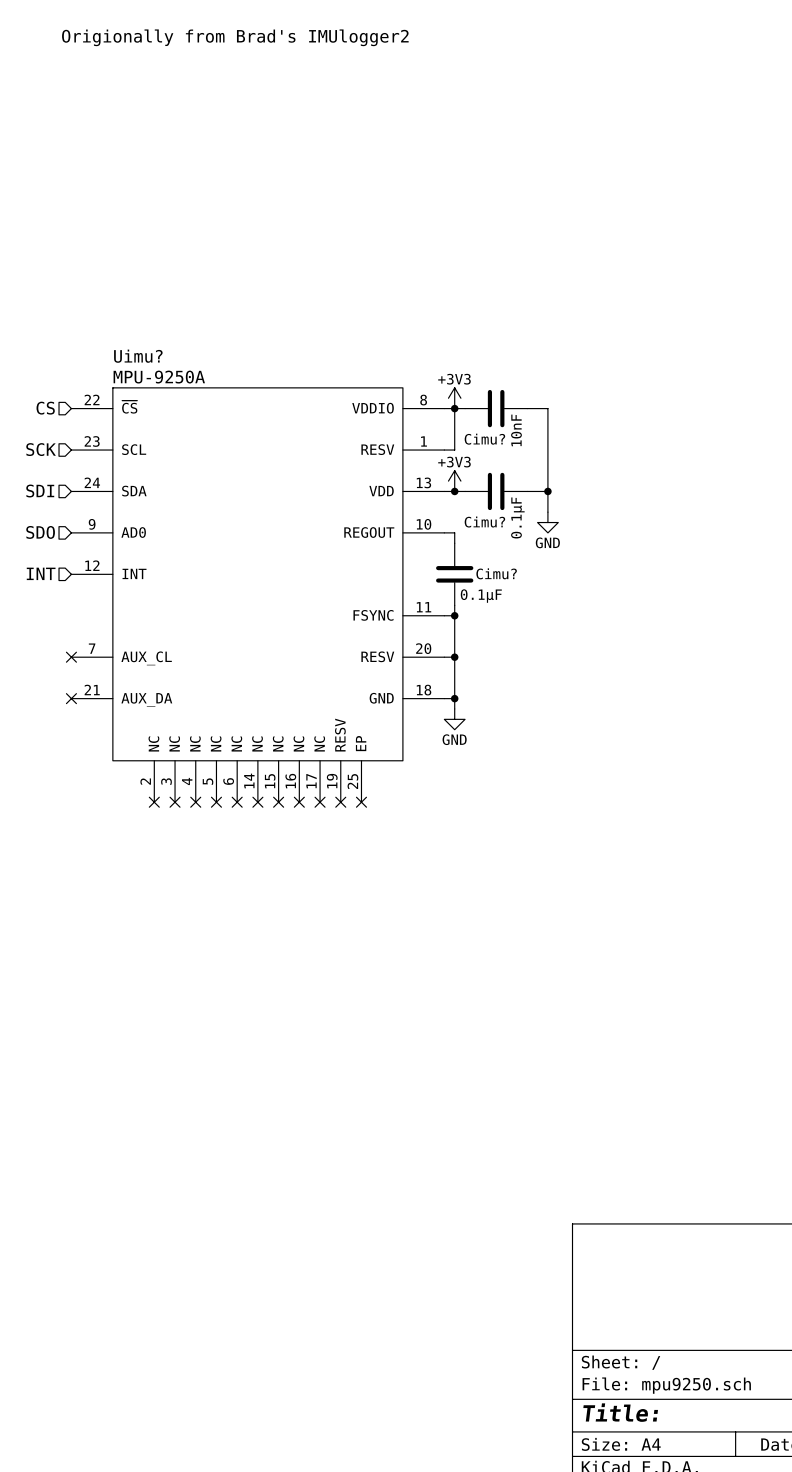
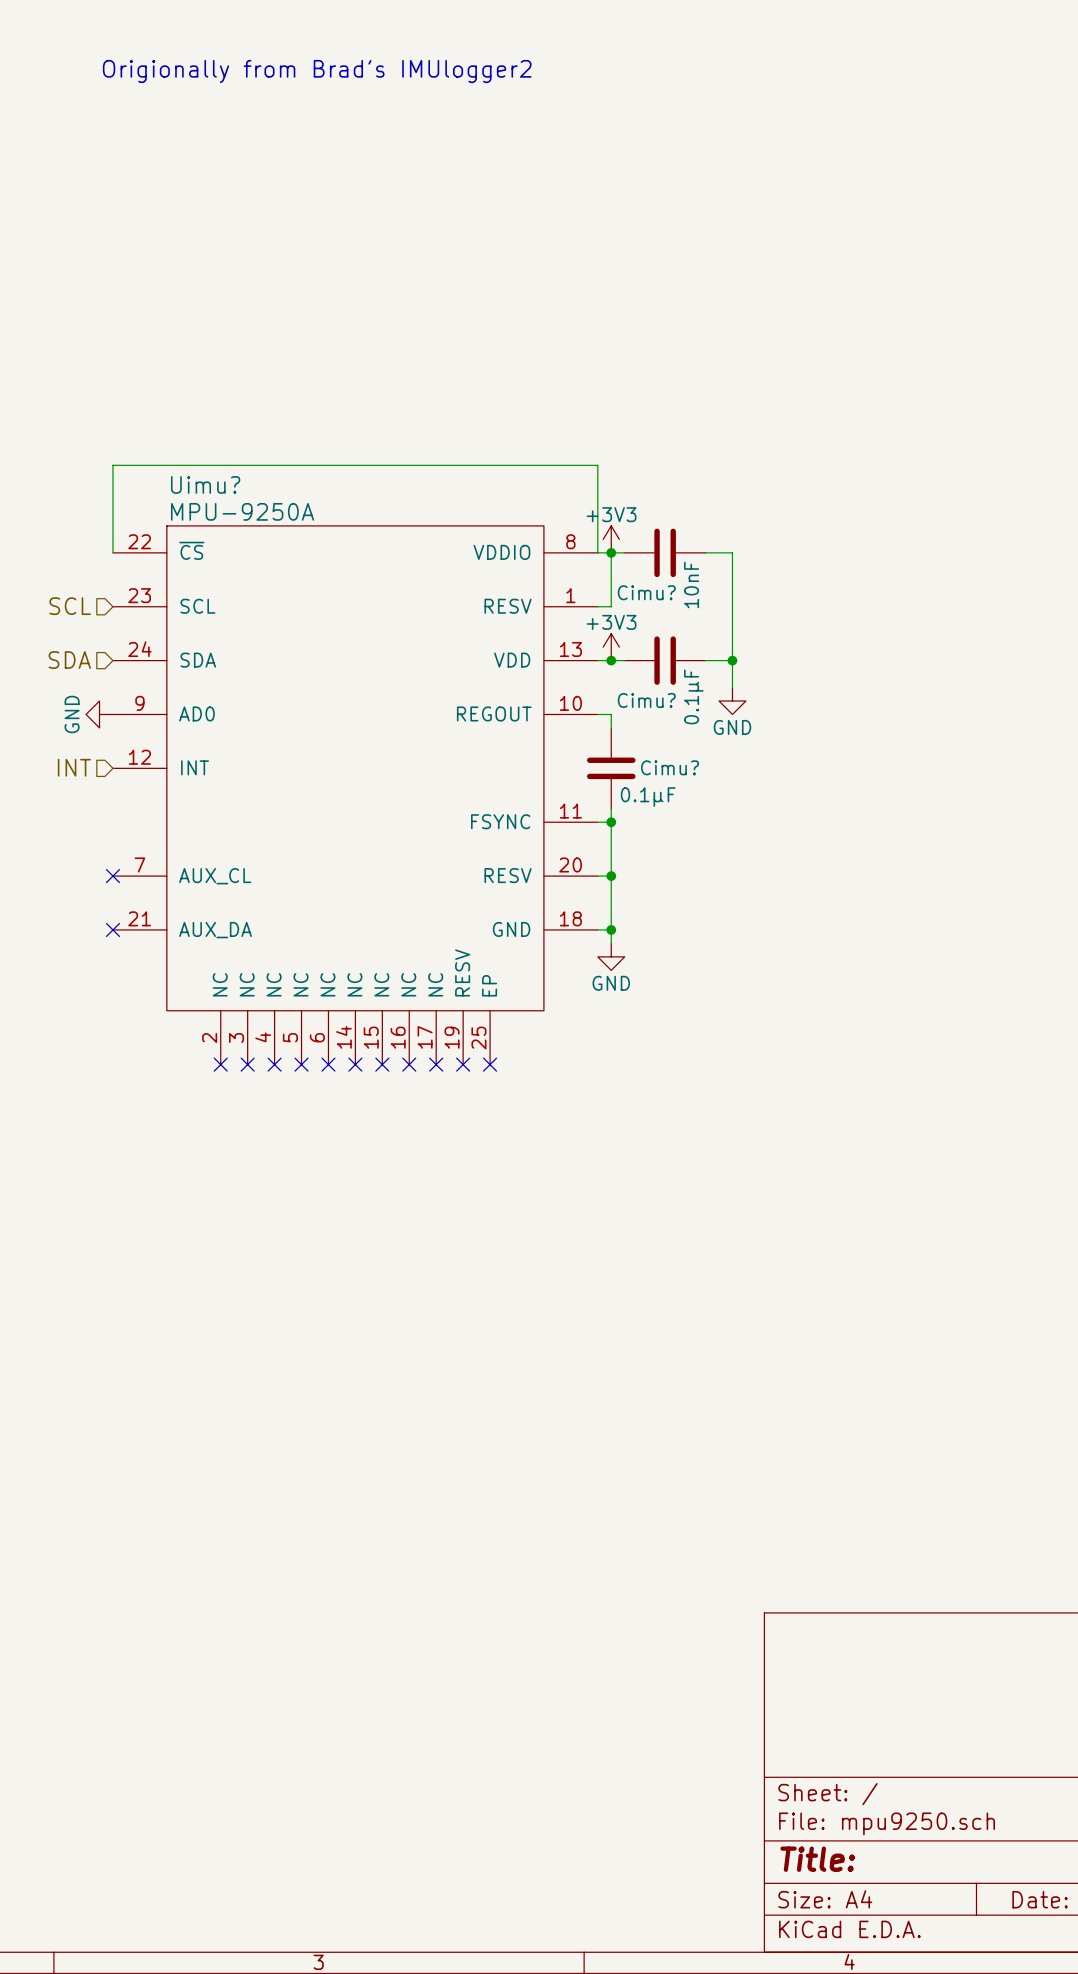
hierarchical label: CS (45, 408) -> none
wire: none -> (112, 552) (112, 465) (597, 465) (597, 552)
hierarchical label: SCK (41, 449) -> SCL (70, 606)
hierarchical label: SDI (40, 491) -> SDA (69, 660)
hierarchical label: SDO (40, 532) -> none
power symbol: none -> GND (99, 714)

